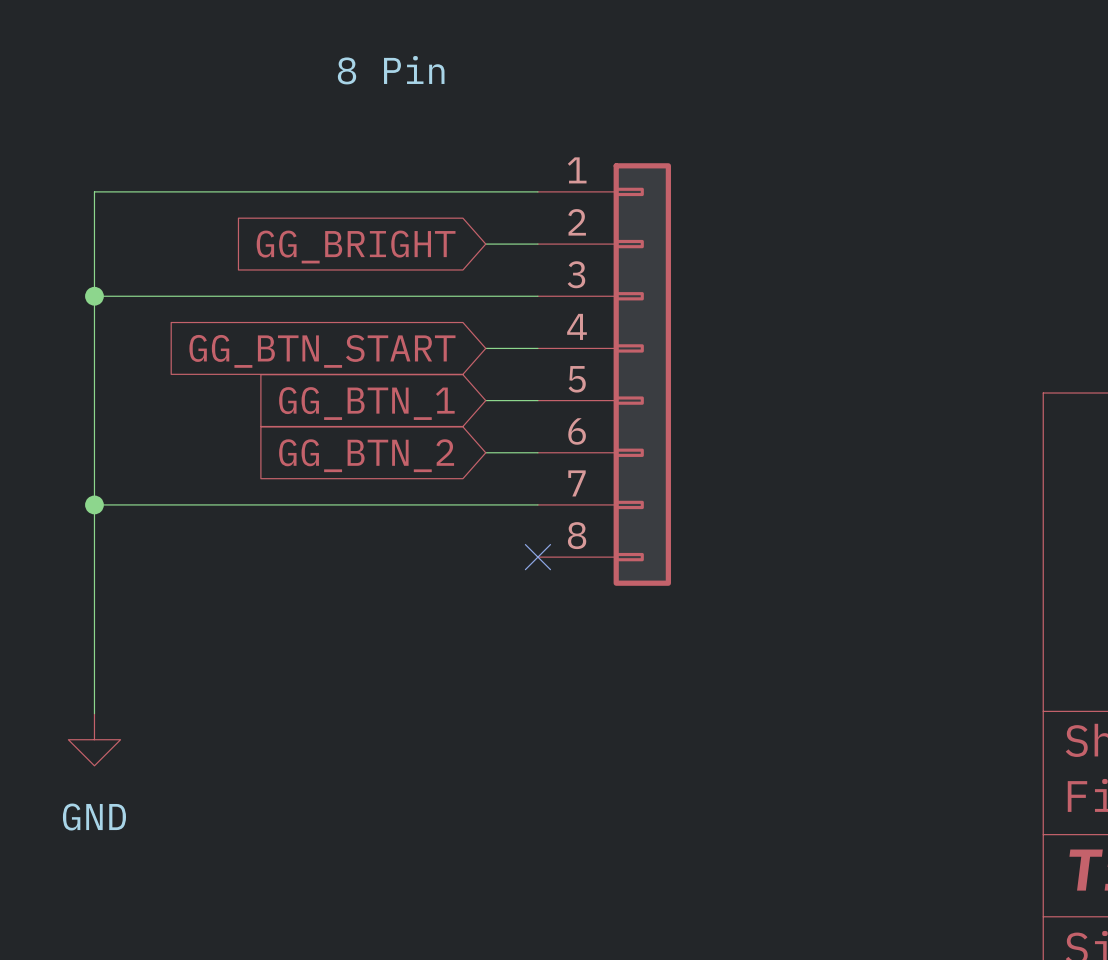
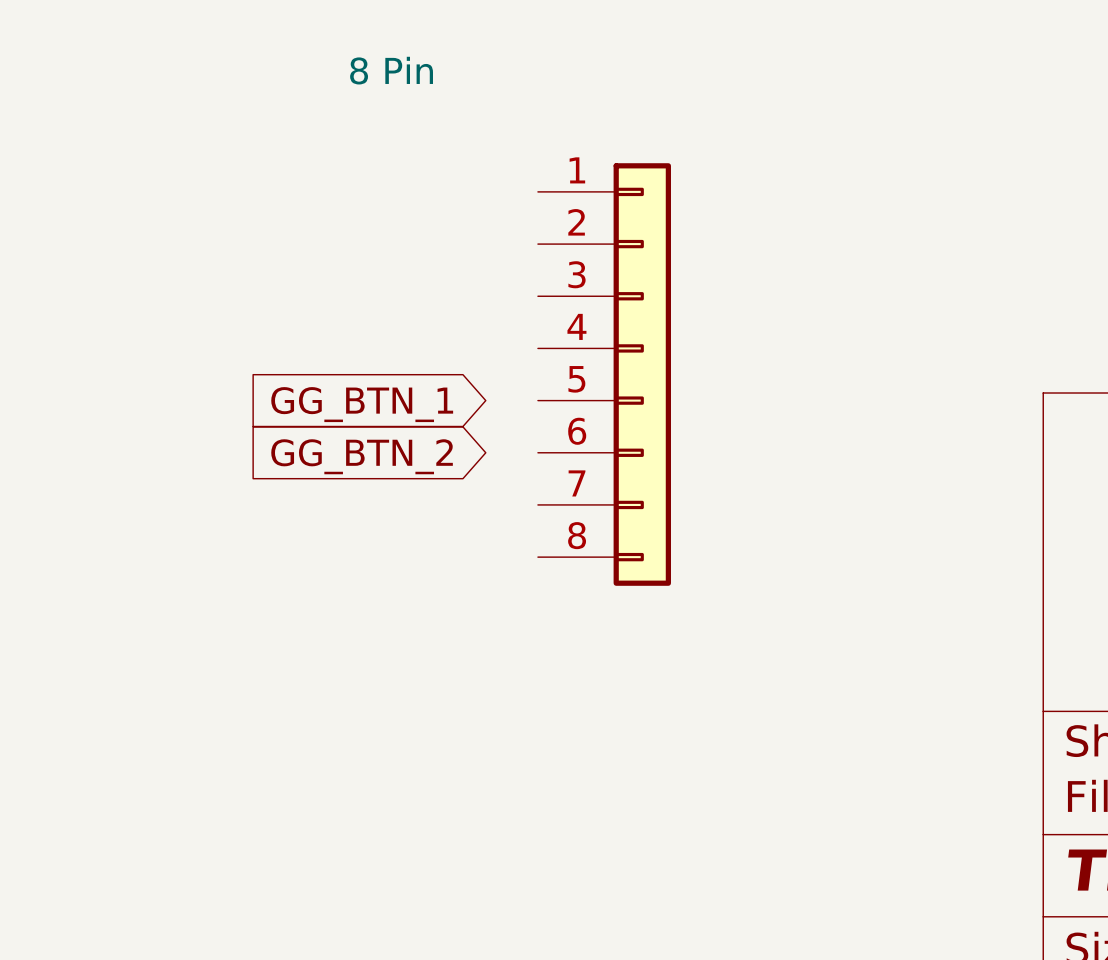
wire: (537, 191) (94, 191) (94, 713) -> none
wire: (485, 244) (537, 244) -> none
global label: GG_BRIGHT (356, 247) -> none
wire: (94, 296) (537, 296) -> none
junction: (94, 296) -> none
wire: (485, 348) (537, 348) -> none
global label: GG_BTN_START (322, 351) -> none
wire: (485, 400) (537, 400) -> none
wire: (485, 452) (537, 452) -> none
wire: (94, 504) (537, 504) -> none
junction: (94, 504) -> none
no-connect mark: (537, 557) -> none
power symbol: GND (94, 739) -> none

